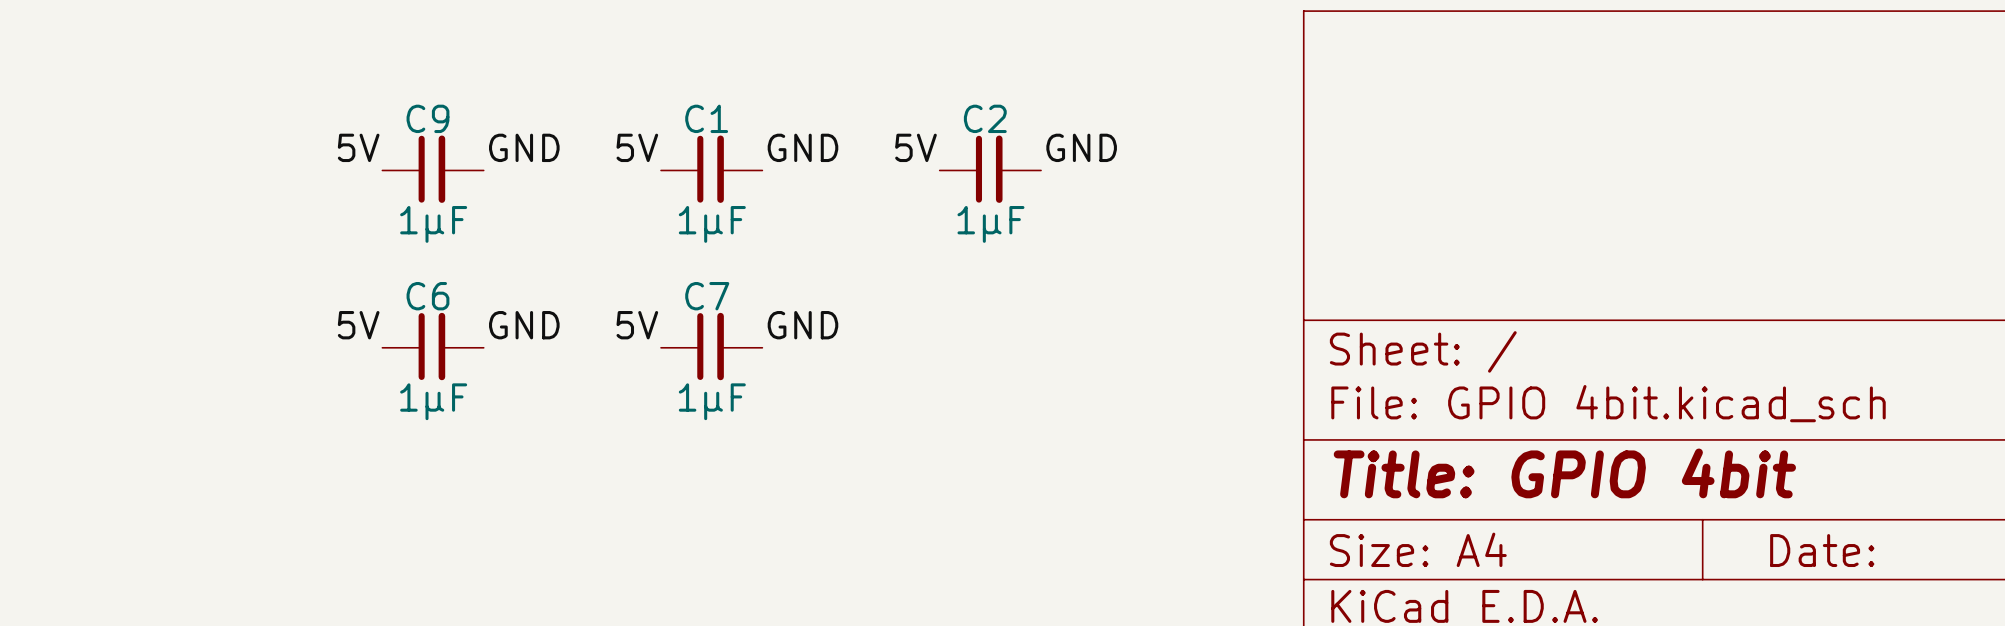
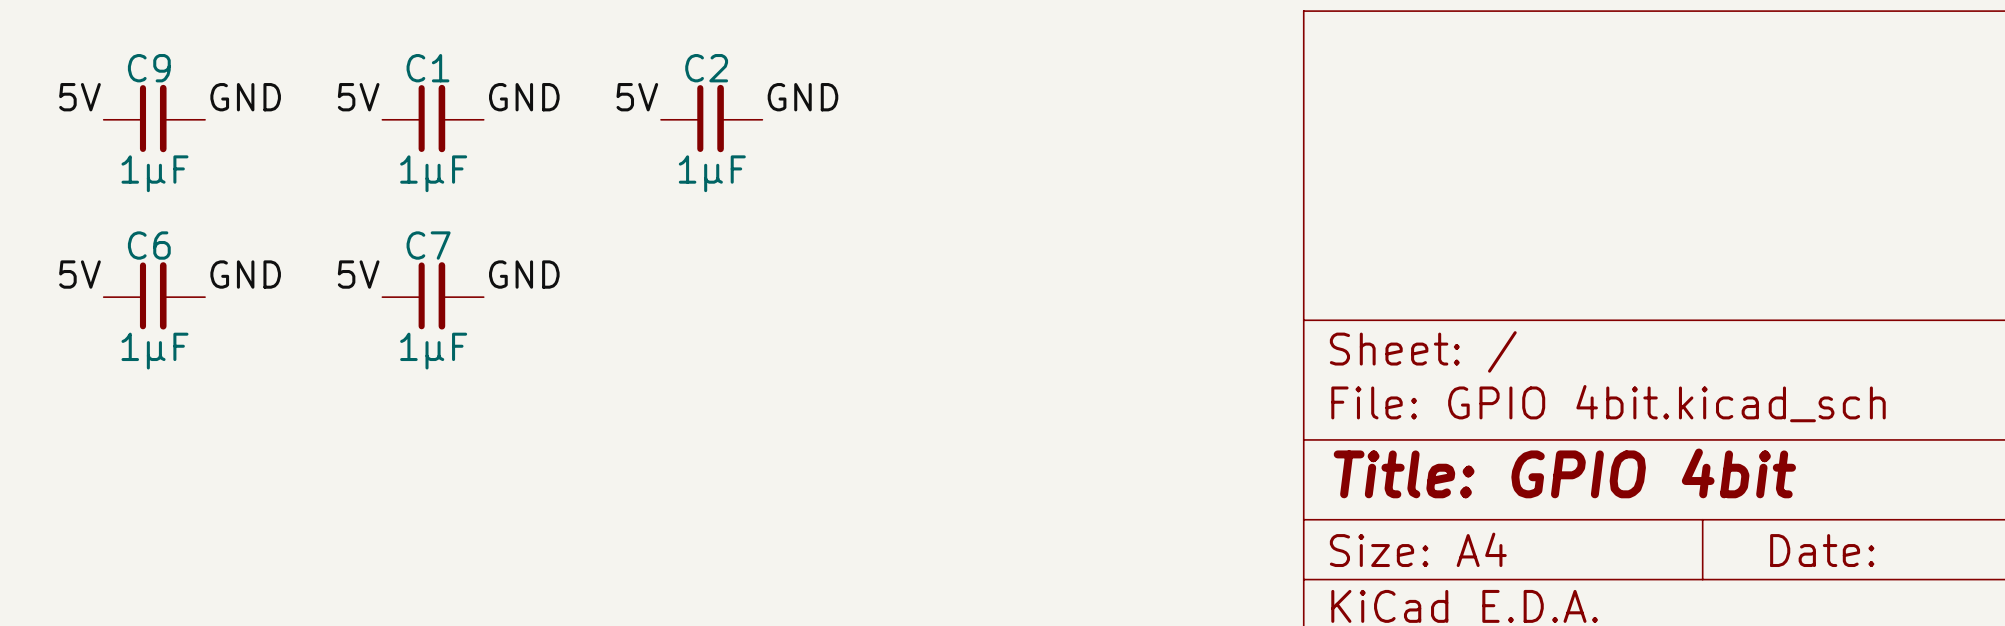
label: none -> 5V (80, 97)
label: none -> GND (245, 97)
label position: 5V (358, 147) -> 5V (358, 97)
label position: GND (524, 147) -> GND (524, 97)
label position: 5V (637, 147) -> 5V (637, 97)
label position: GND (802, 147) -> GND (802, 97)
label: 5V (915, 147) -> none
label: GND (1081, 147) -> none
C9 position: (433, 169) -> (154, 118)
C1 position: (711, 169) -> (433, 118)
C2 position: (990, 169) -> (711, 118)
label: none -> 5V (80, 274)
label: none -> GND (245, 274)
label position: 5V (358, 325) -> 5V (358, 274)
label position: GND (524, 325) -> GND (524, 274)
label: 5V (637, 325) -> none
label: GND (802, 325) -> none
C6 position: (433, 346) -> (154, 295)
C7 position: (711, 346) -> (433, 295)

